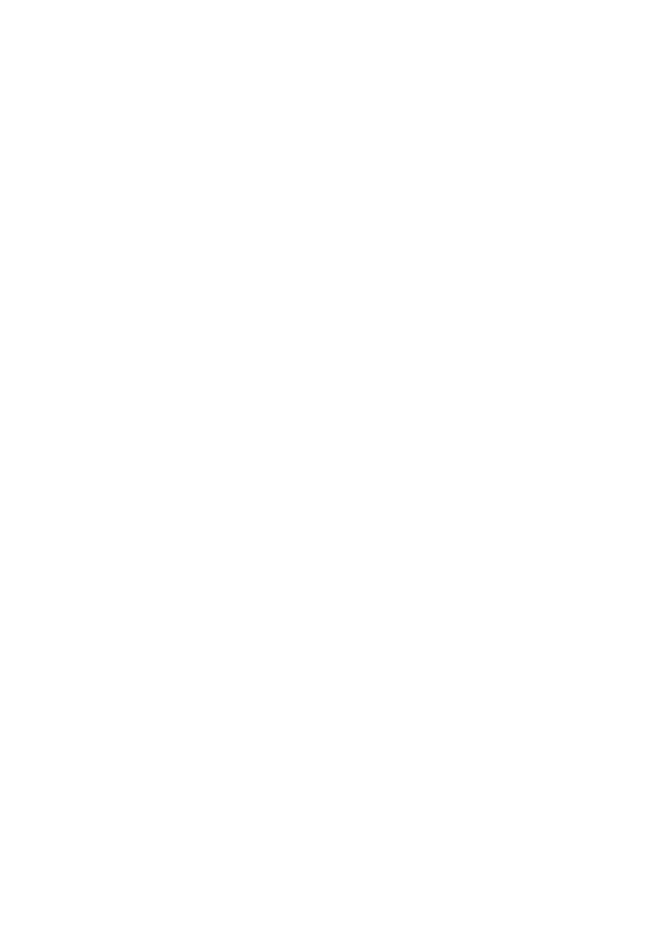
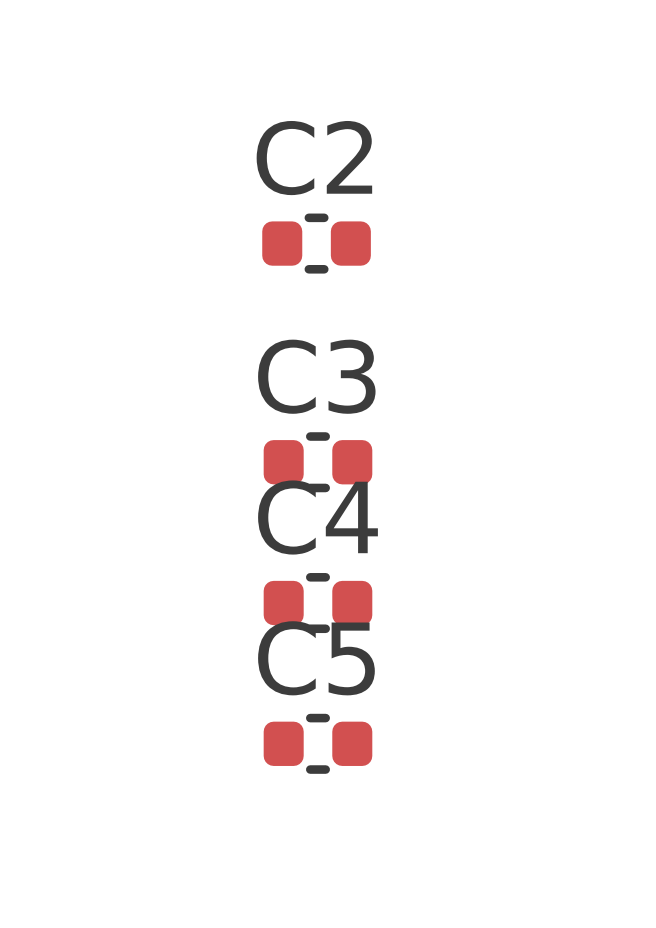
C2: none -> (316, 243)
C3: none -> (317, 462)
C4: none -> (317, 603)
C5: none -> (317, 743)

